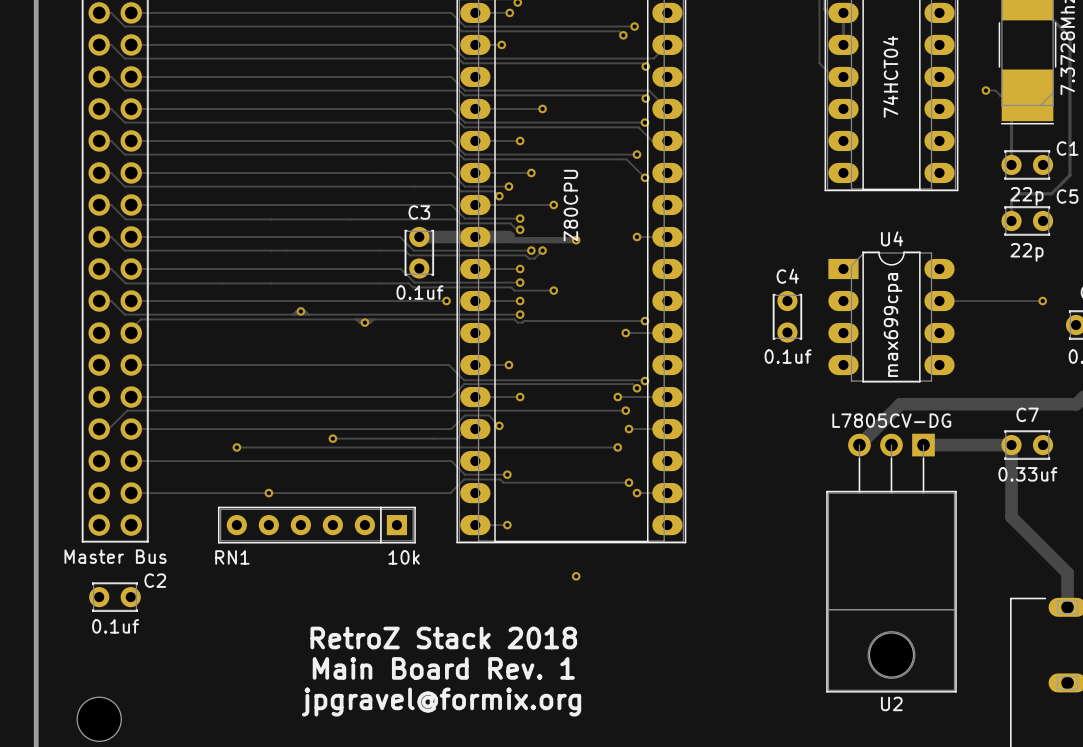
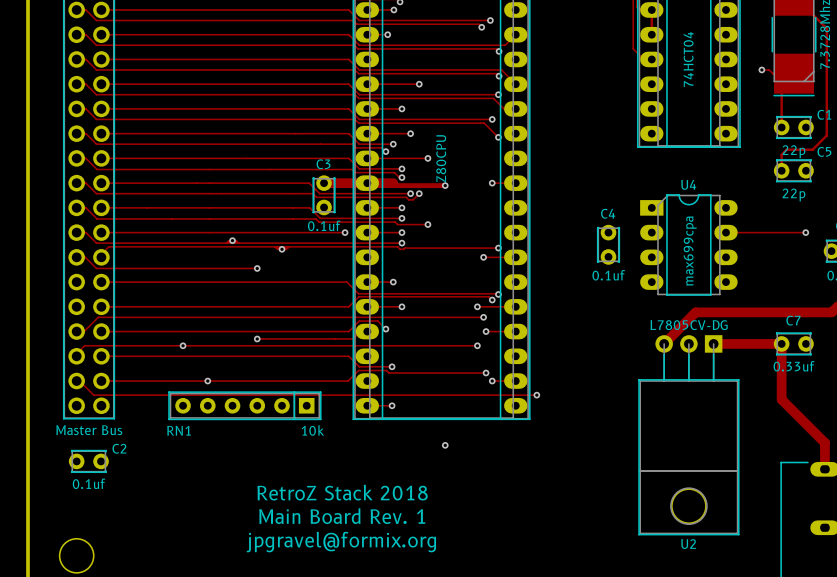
track: none -> (76, 257) (85, 257) (96, 268) (257, 268)
via: none -> (257, 268)
track: none -> (183, 345) (84, 345) (76, 353) (76, 356)
track: none -> (76, 381) (79, 381) (93, 395) (536, 395)
via: none -> (536, 395)

